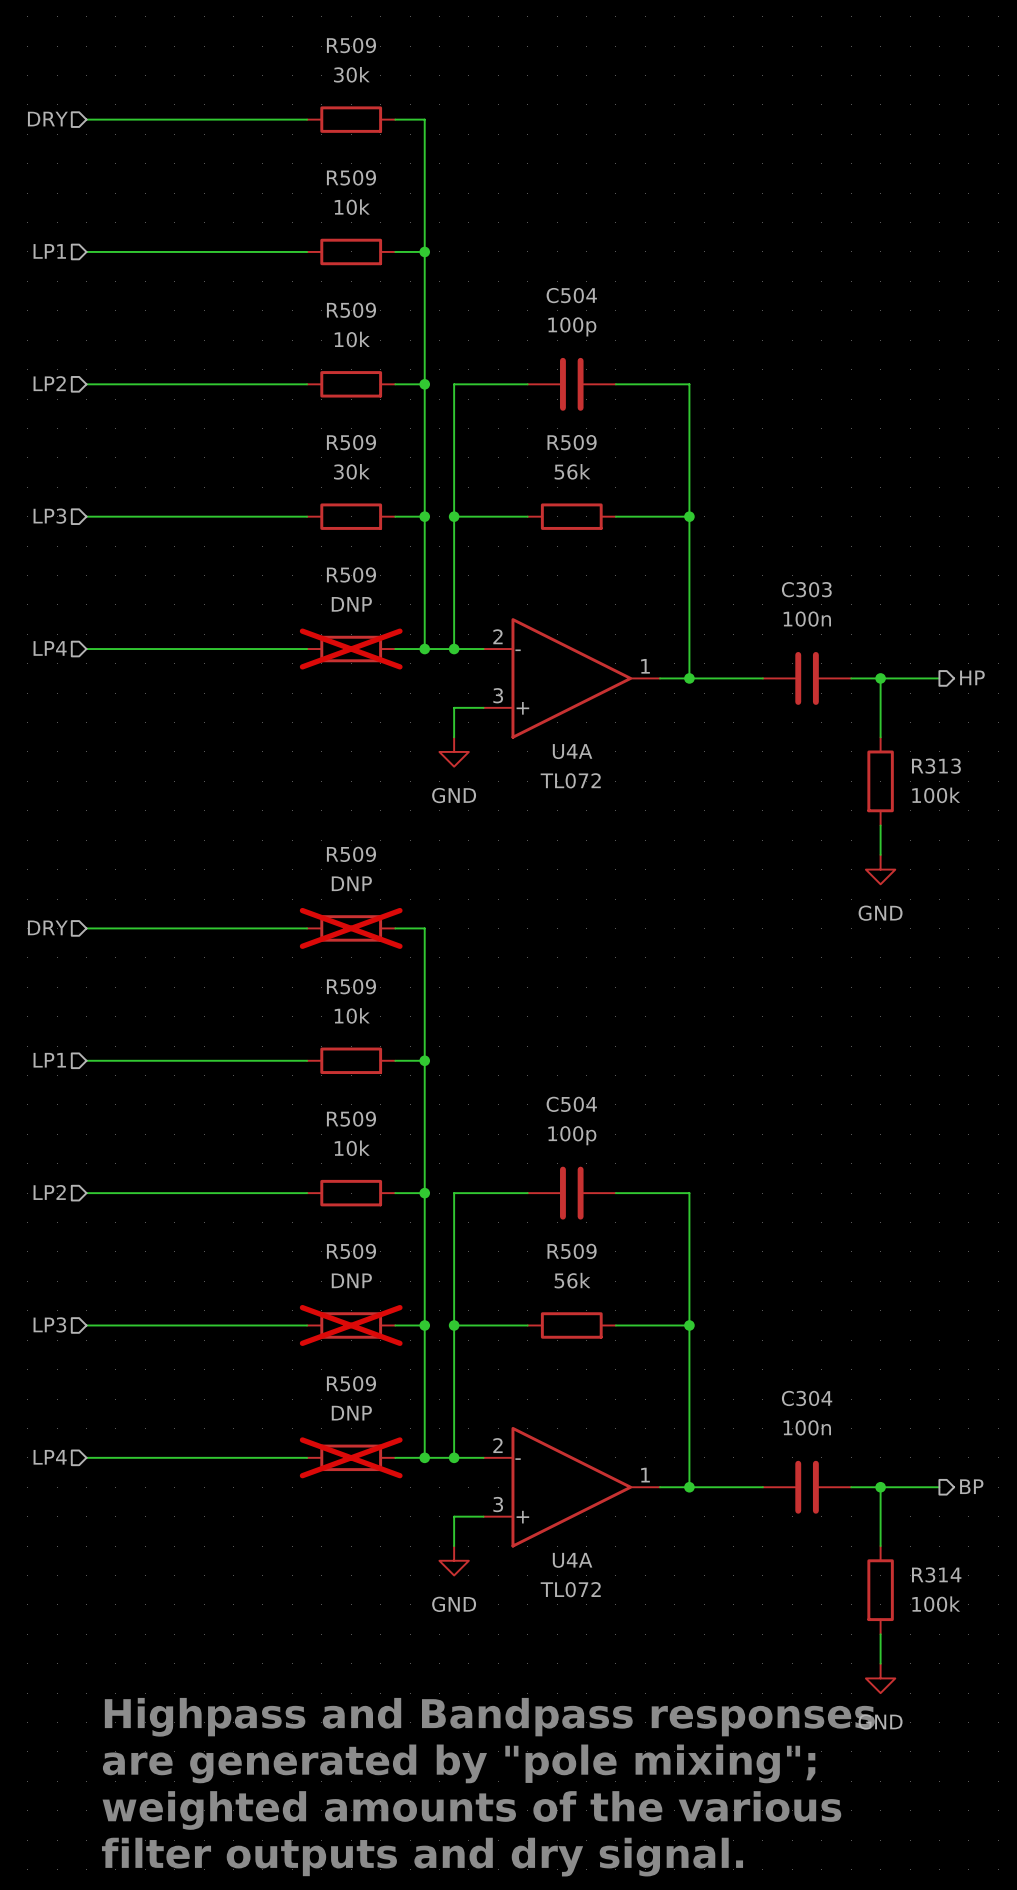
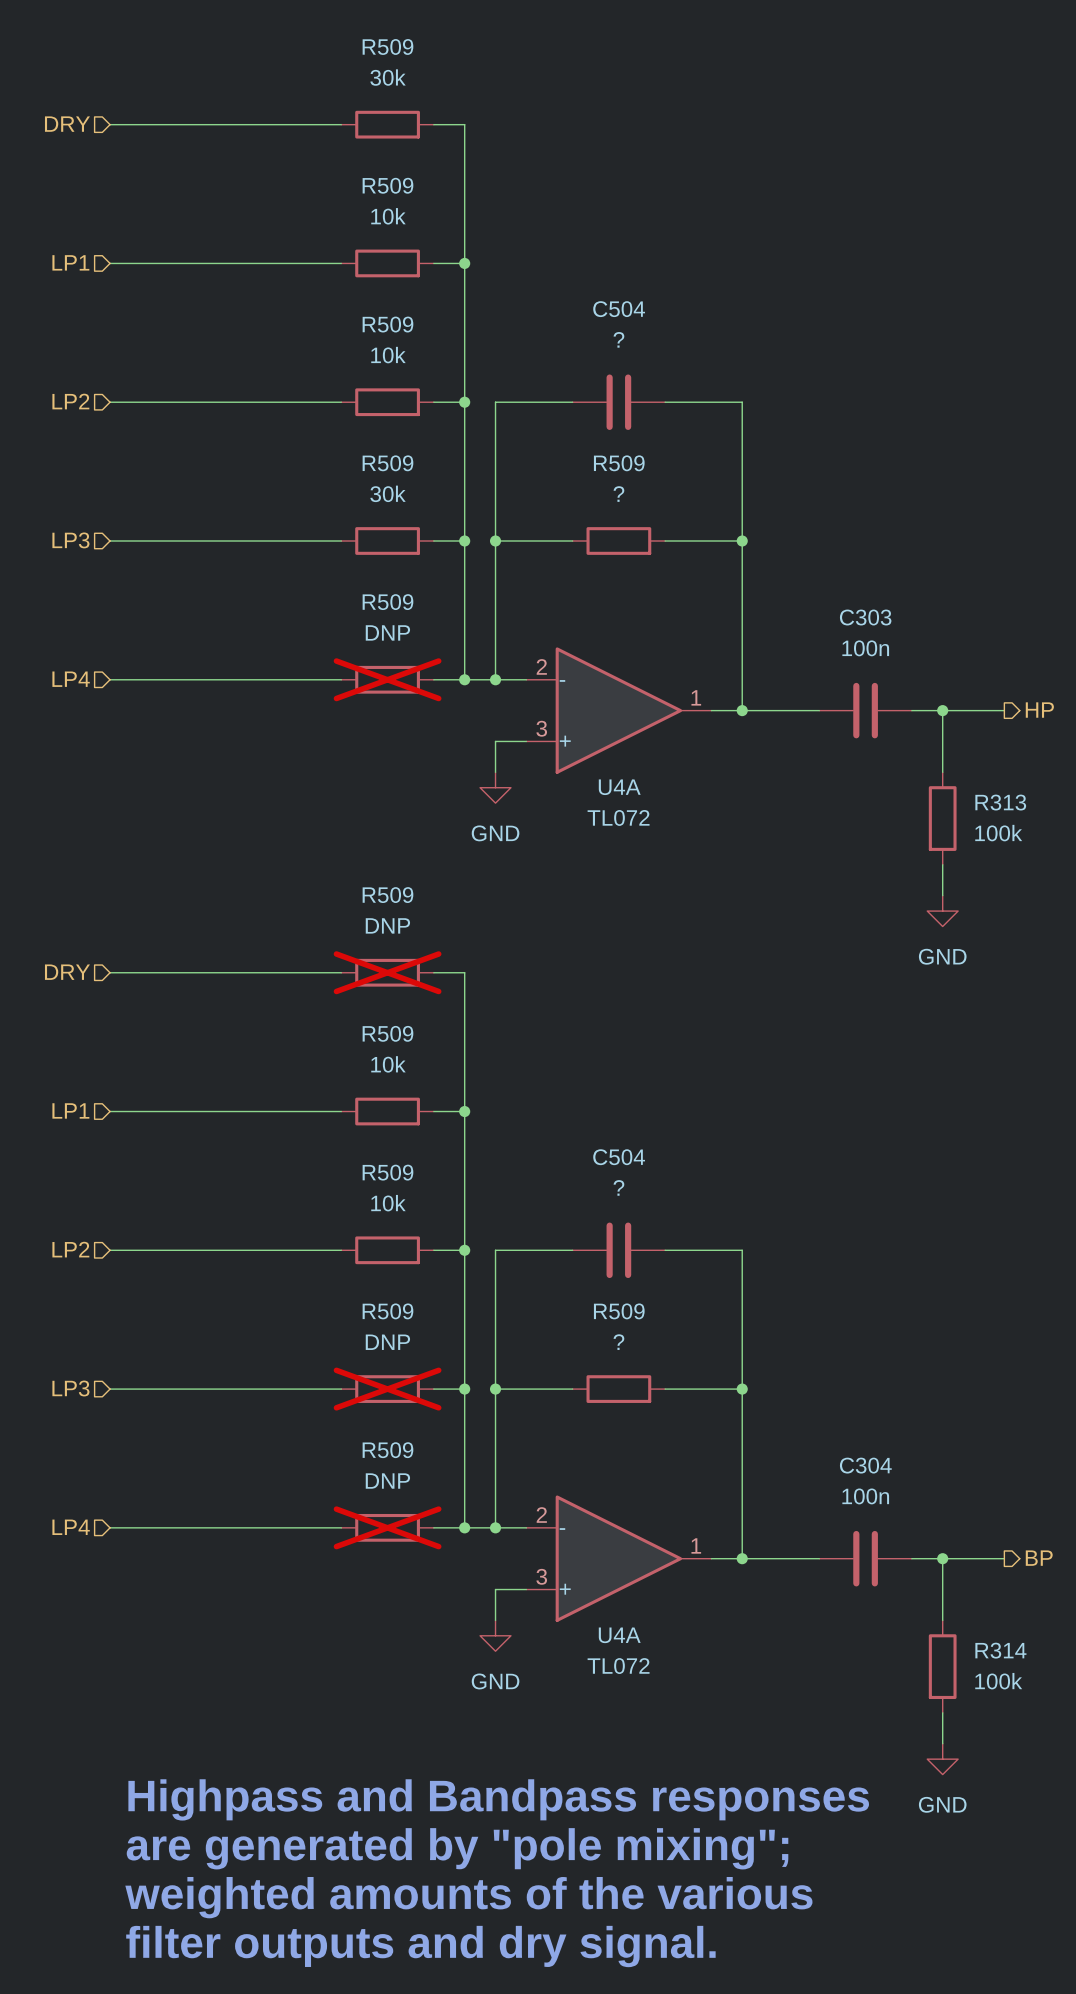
C504 value: 100p (572, 326) -> ? (618, 339)
R509 value: 56k (572, 471) -> ? (618, 494)
C504 value: 100p (572, 1135) -> ? (618, 1187)
R509 value: 56k (572, 1280) -> ? (618, 1342)

